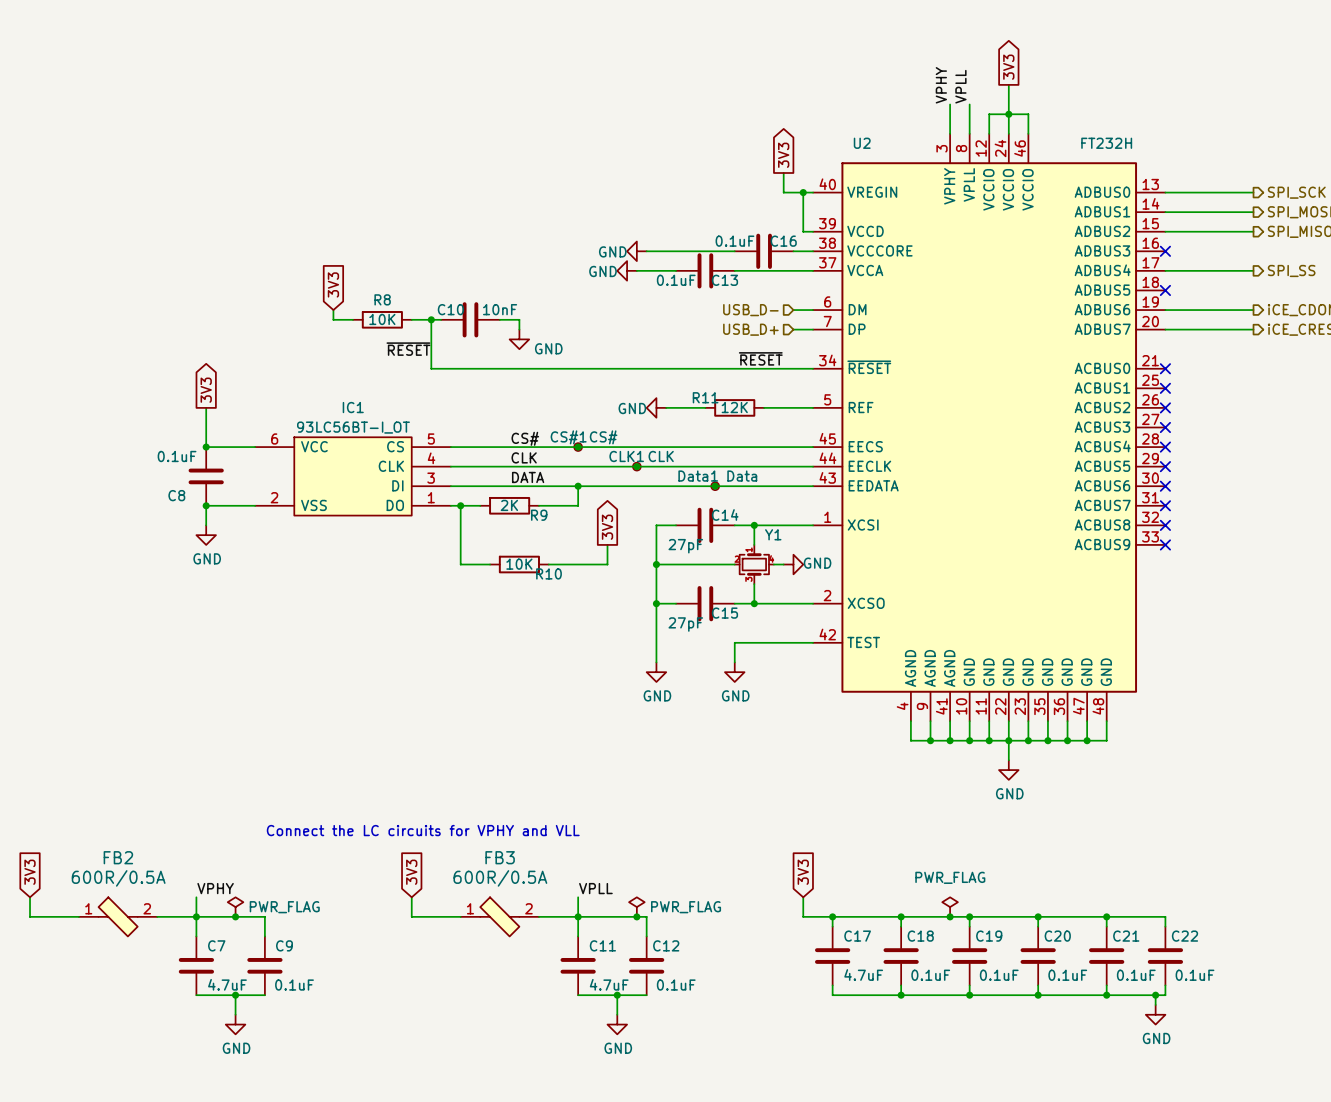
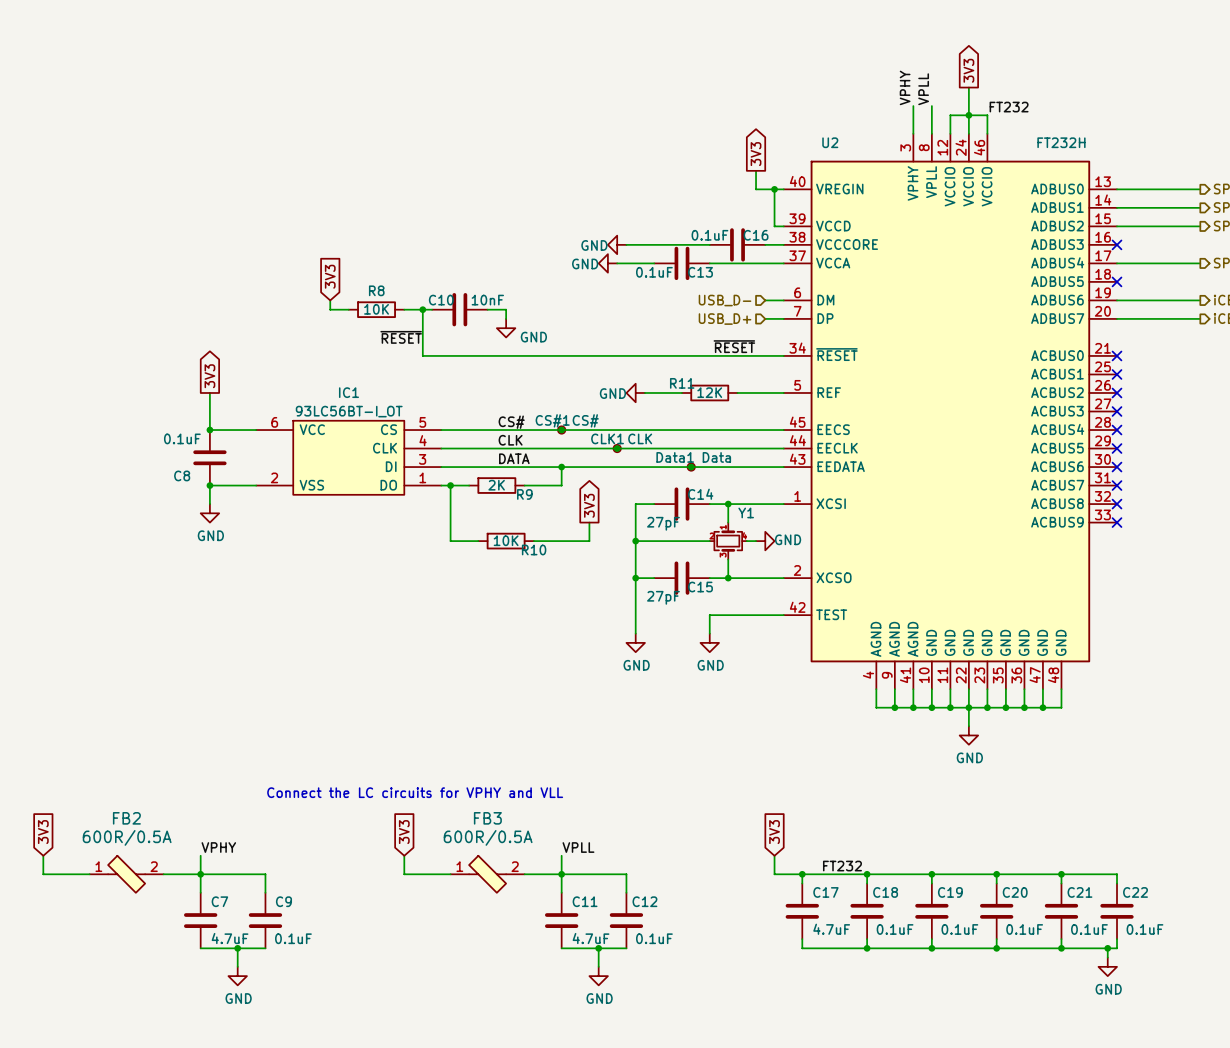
label: none -> FT232 (1009, 107)
power symbol: PWR_FLAG (235, 907) -> none
power symbol: PWR_FLAG (636, 907) -> none
power symbol: PWR_FLAG (950, 907) -> none
label: none -> FT232 (842, 866)
junction: (235, 916) -> none
junction: (636, 916) -> none
junction: (950, 916) -> none

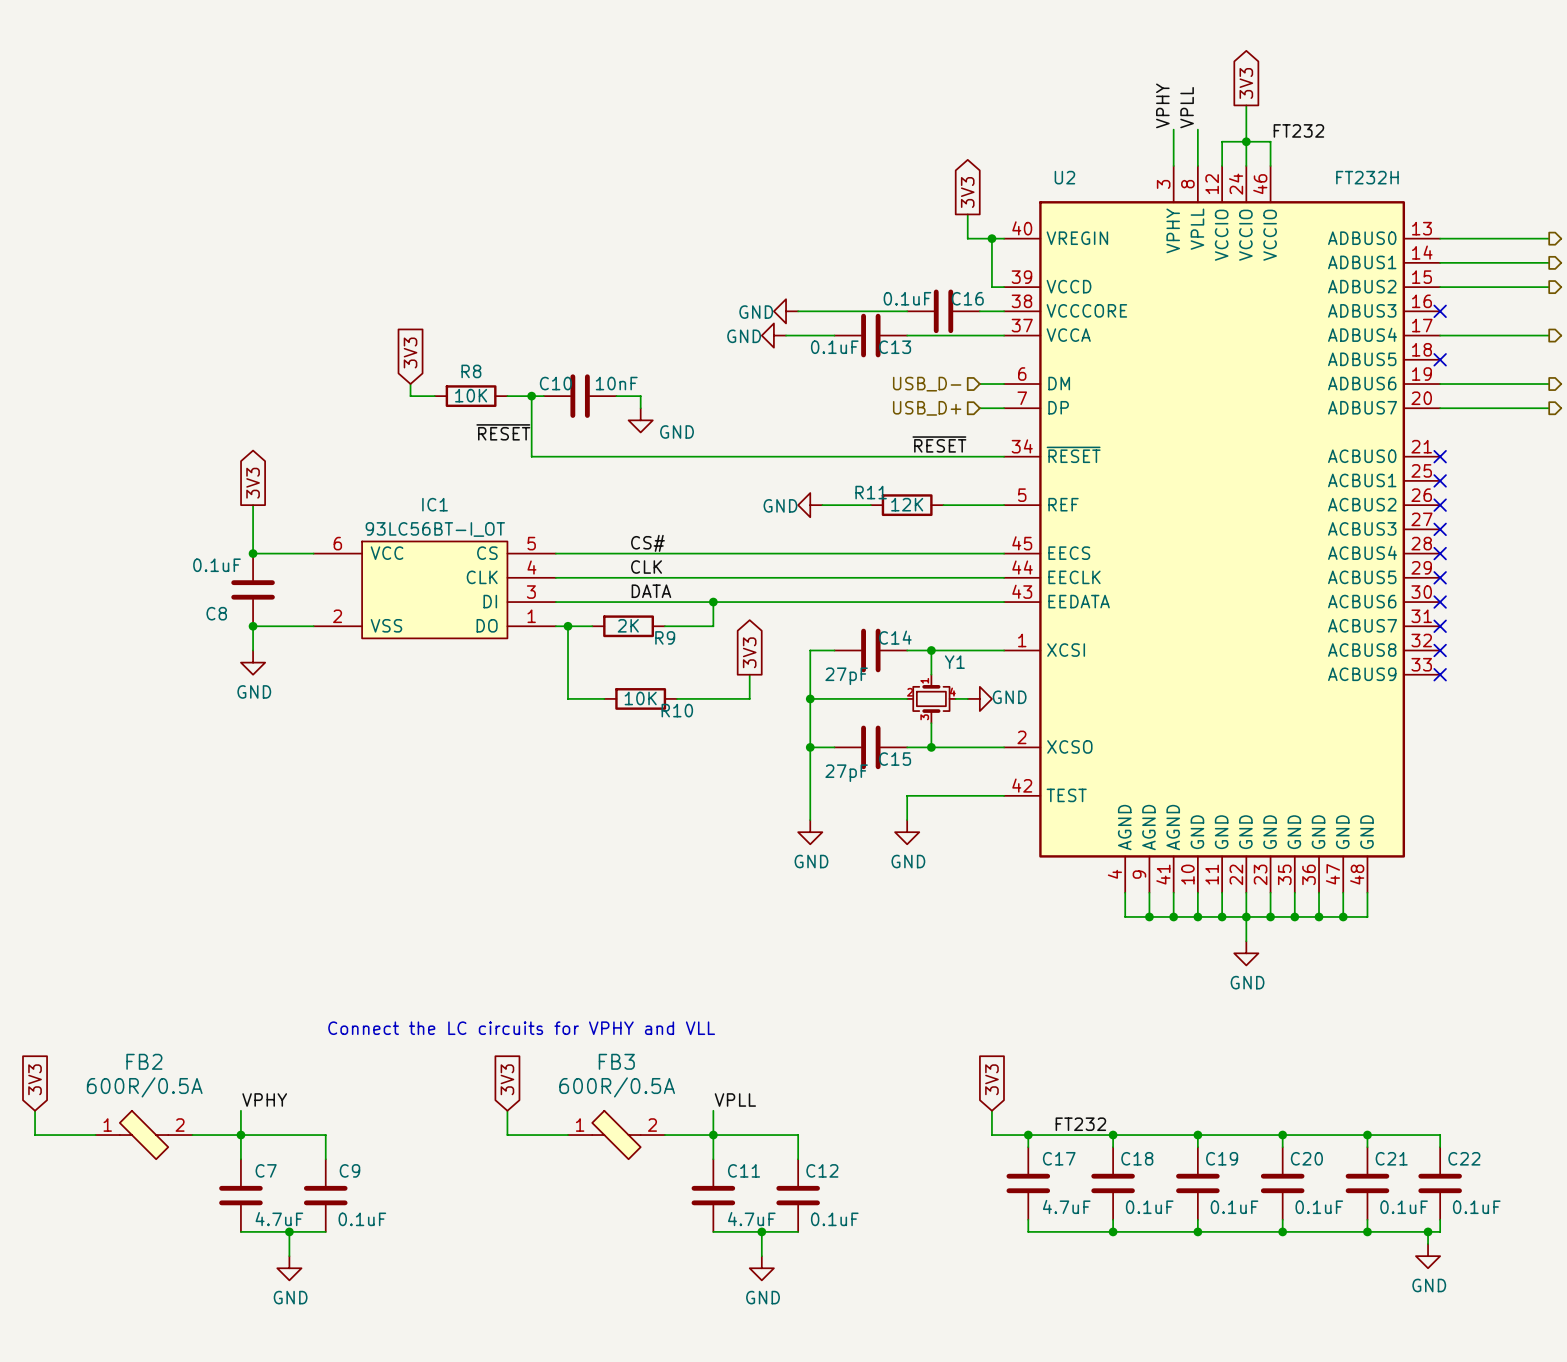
junction: (561, 430) -> none
CS#1: CS# (561, 430) -> none
junction: (617, 448) -> none
CLK1: CLK (617, 448) -> none
junction: (691, 467) -> none
Data1: Data (691, 467) -> none

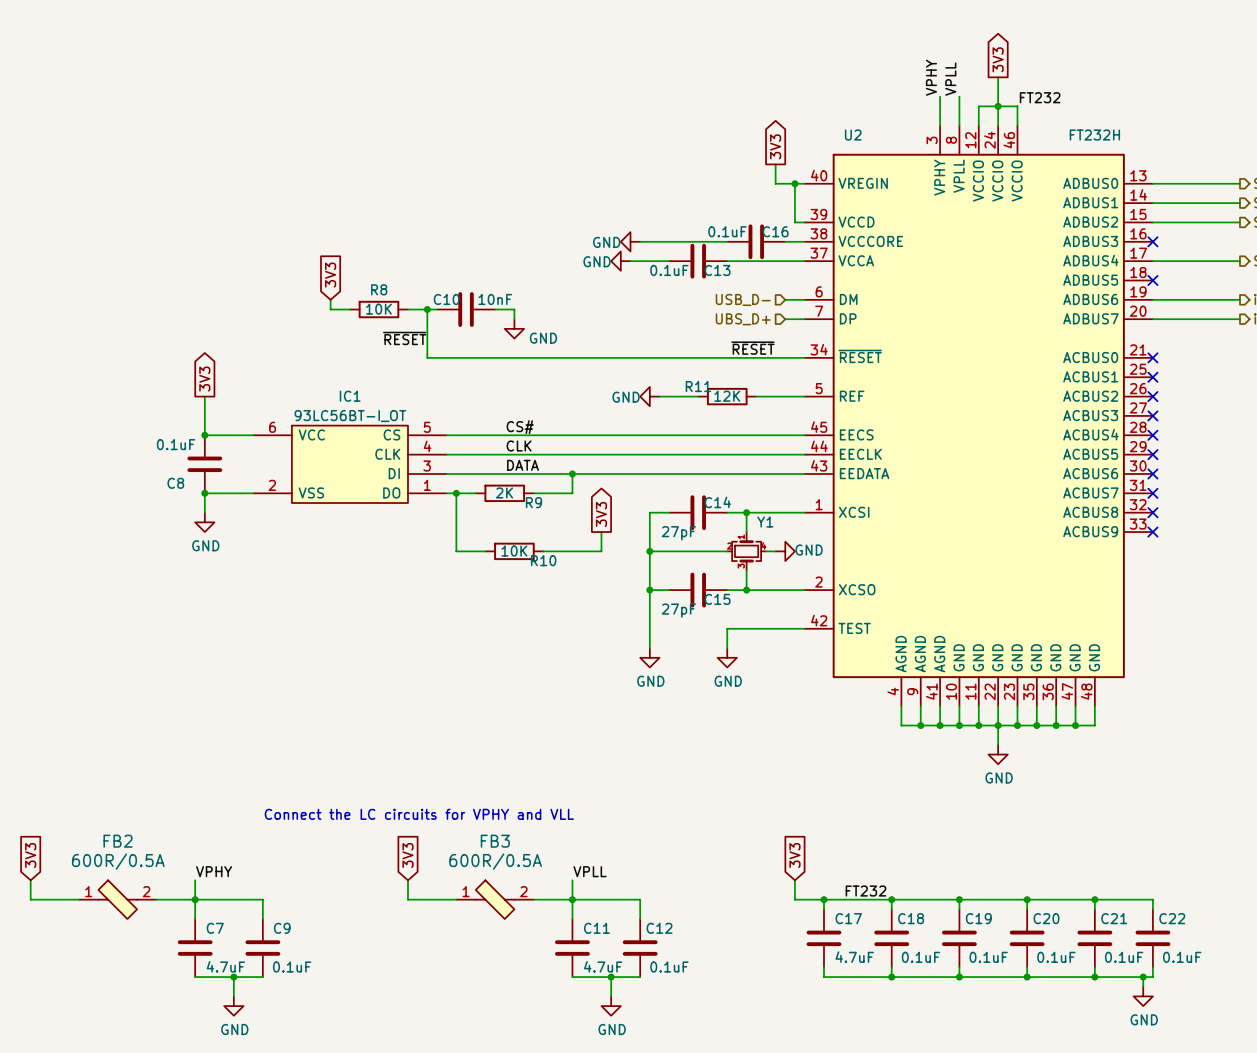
hierarchical label: USB_D+ (927, 408) -> UBS_D+ (743, 319)

